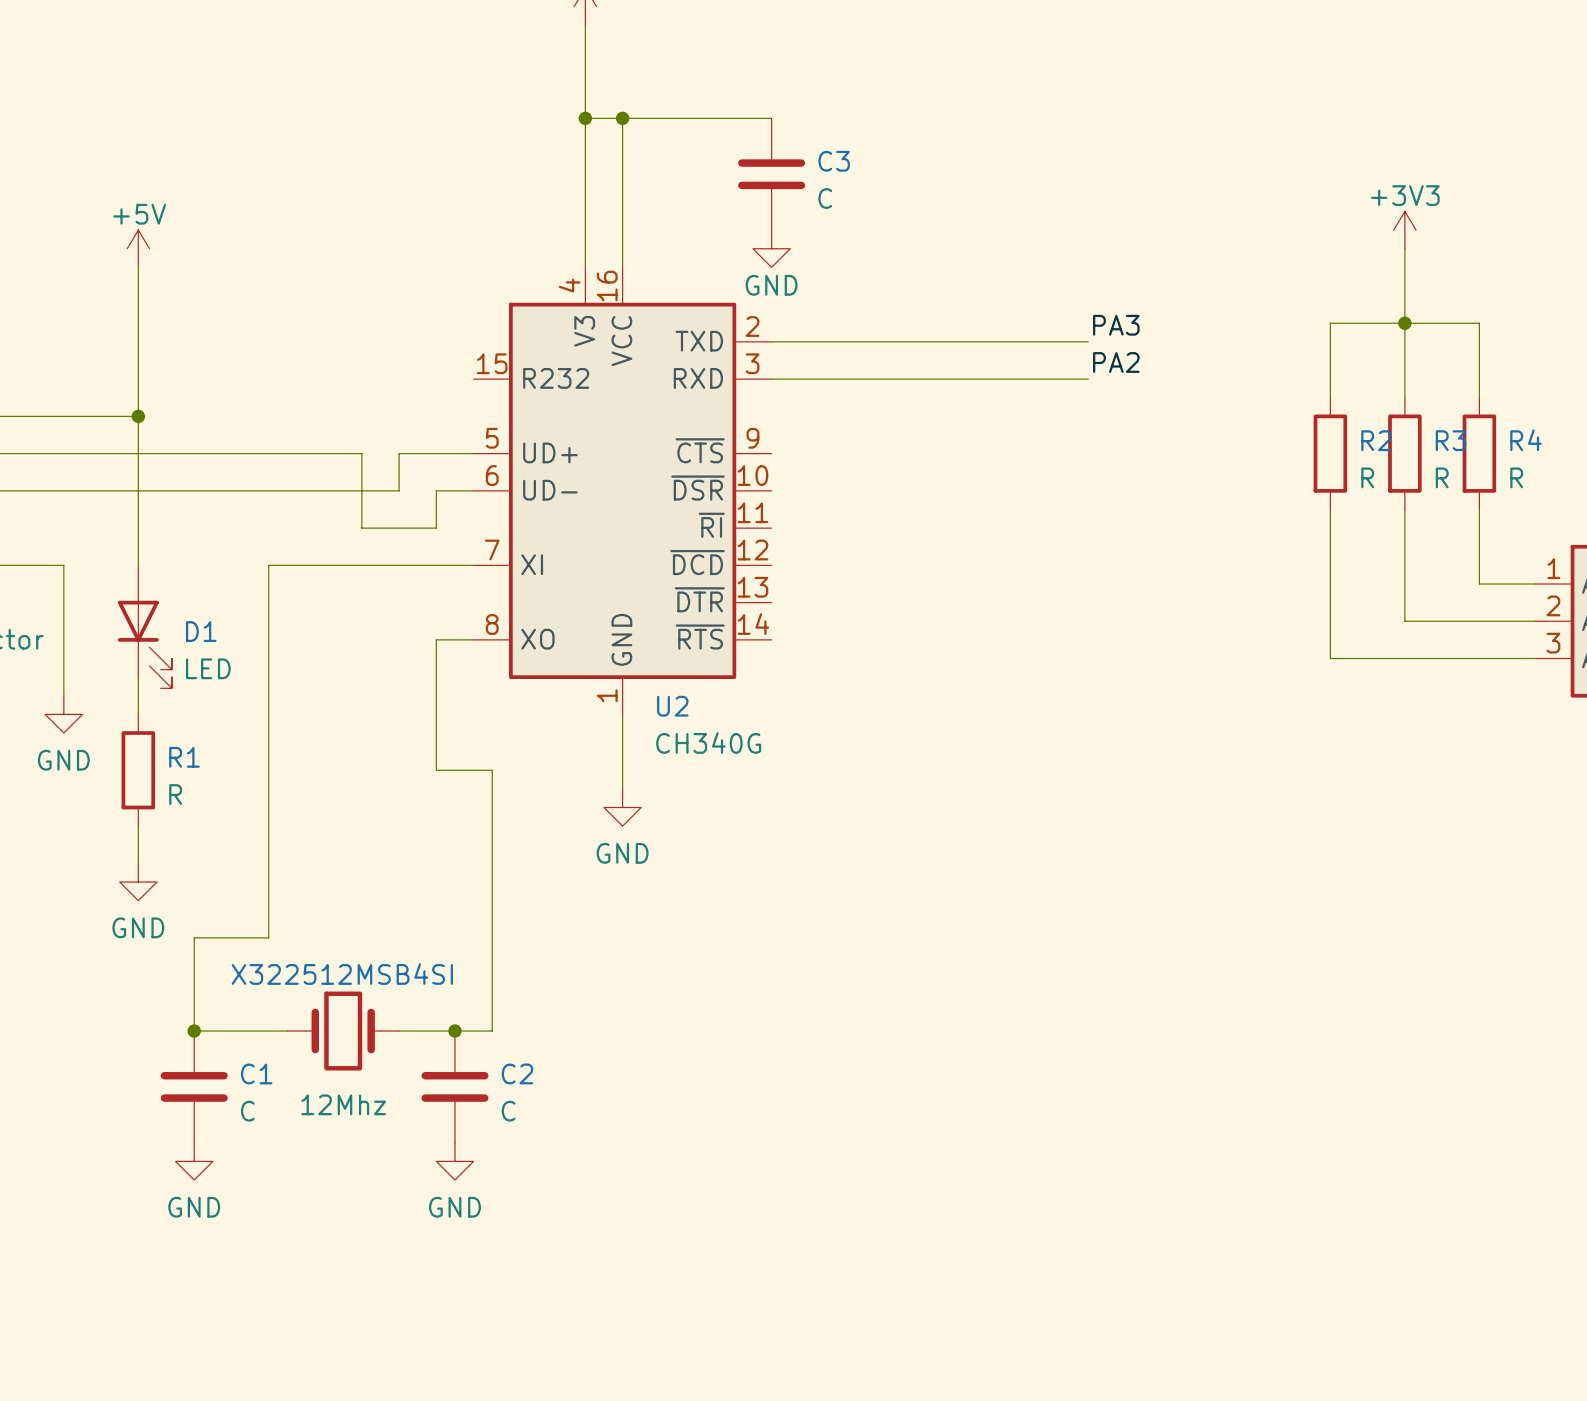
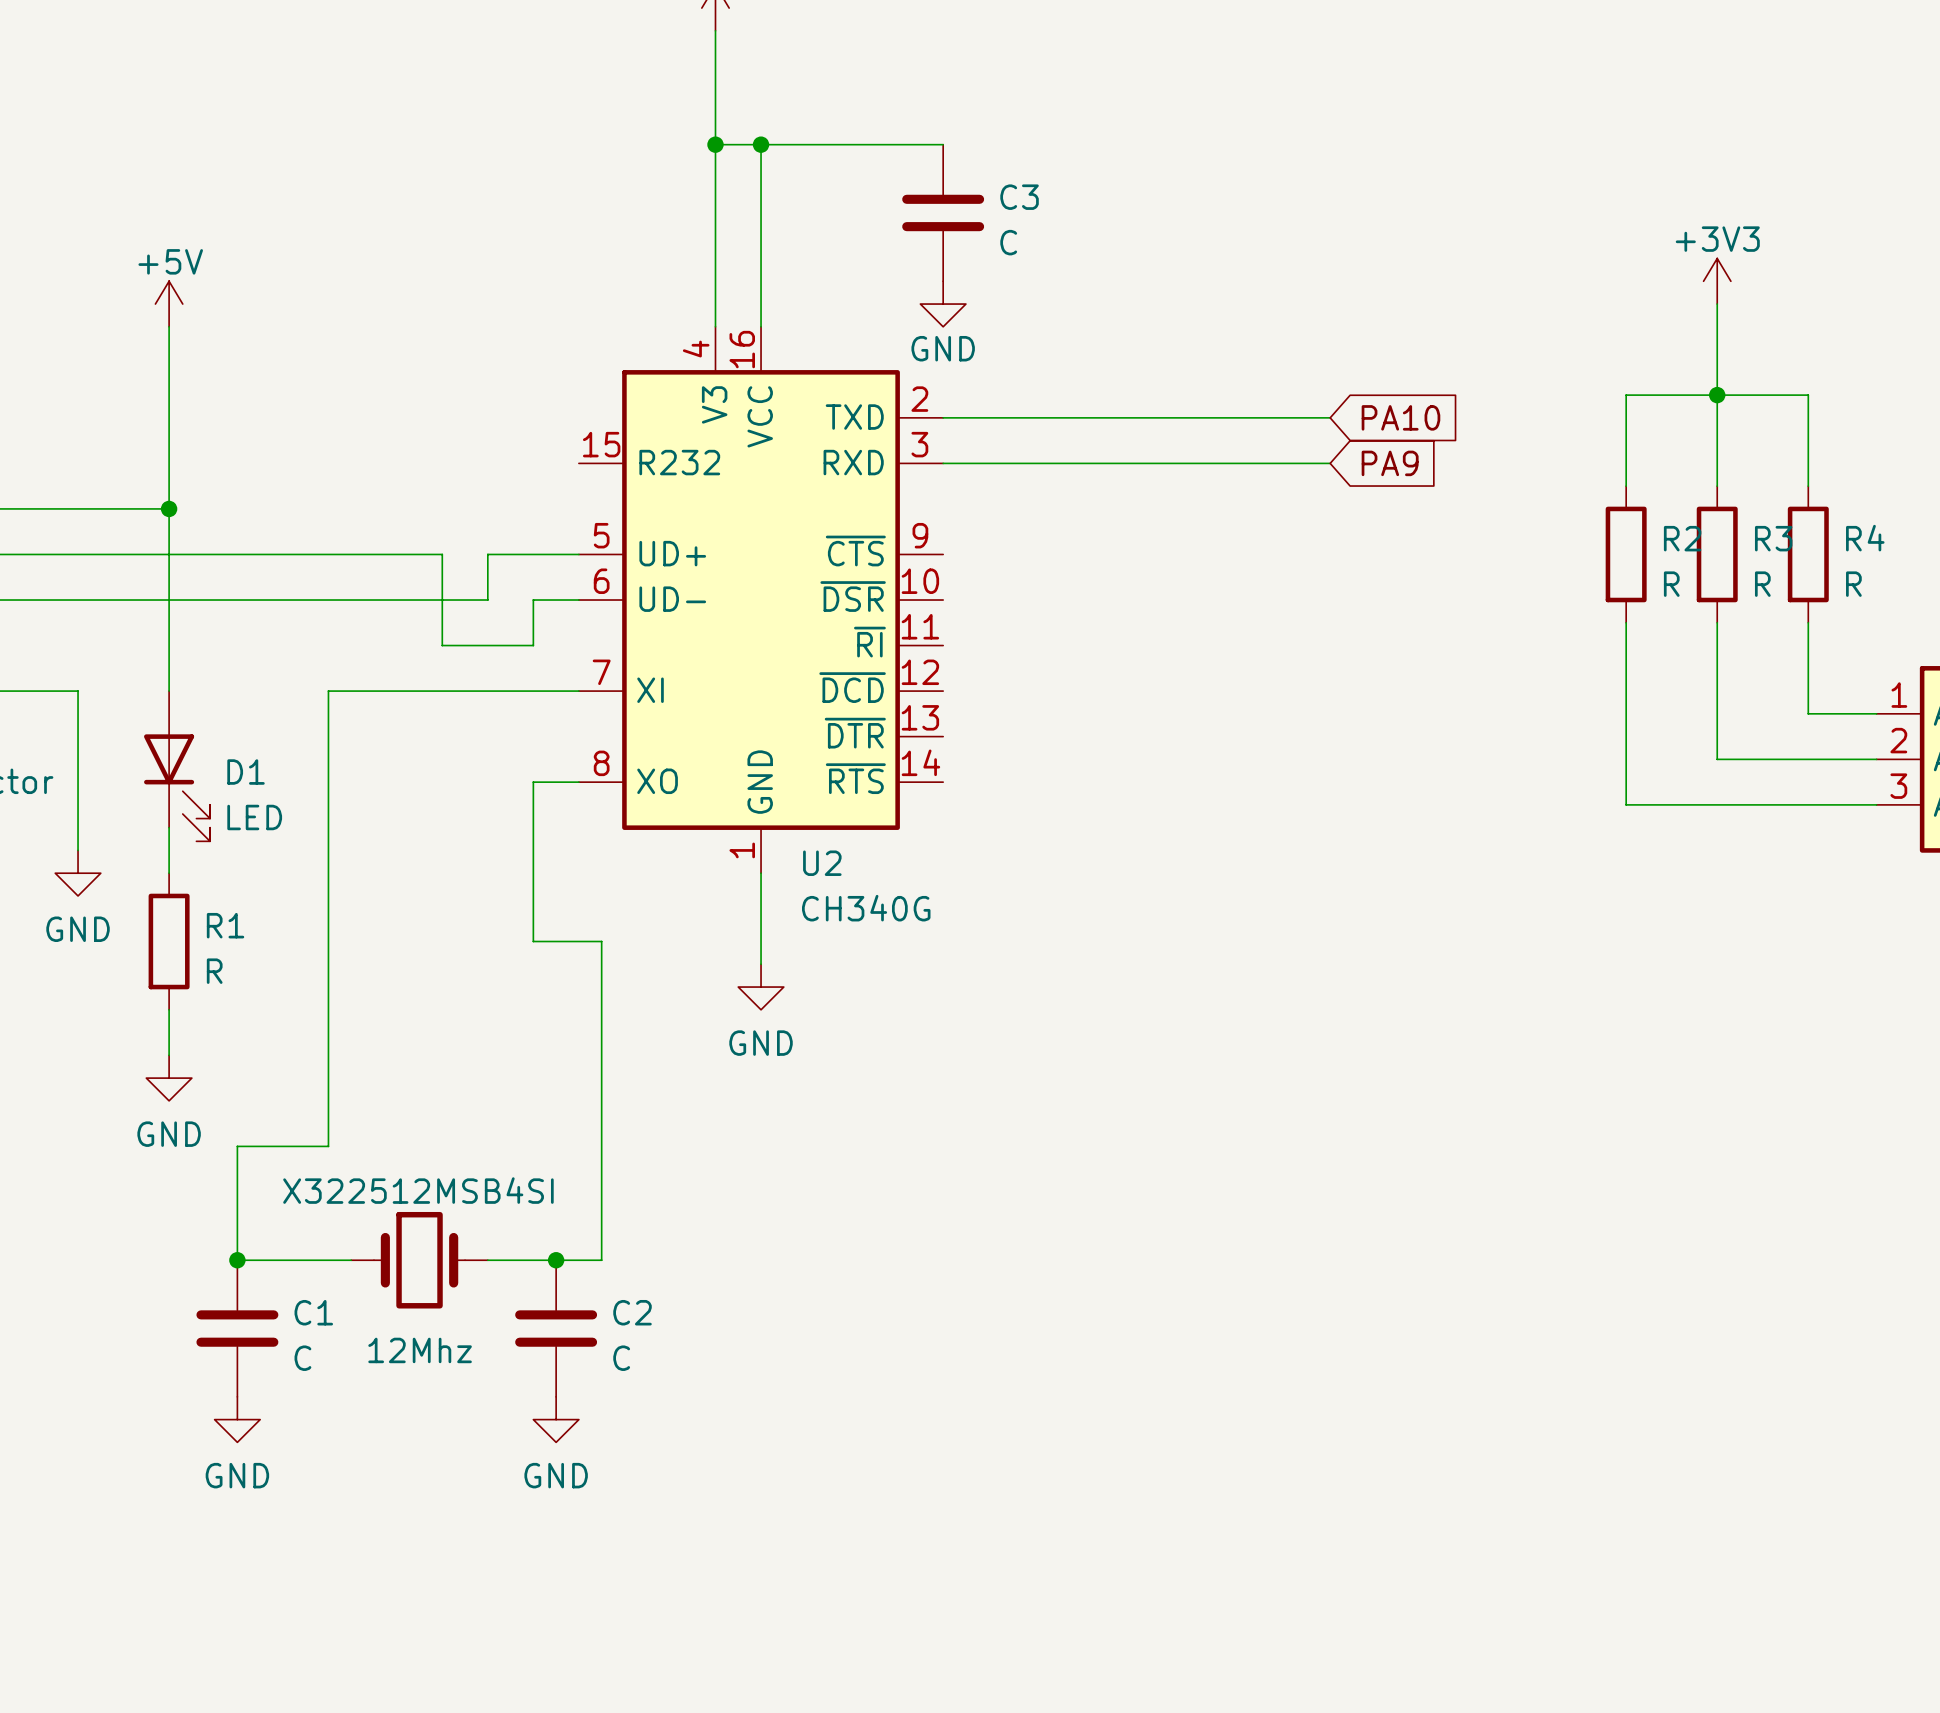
label: PA3 (1116, 325) -> none
global label: none -> PA10 (1400, 417)
label: PA2 (1116, 362) -> none
global label: none -> PA9 (1390, 463)

